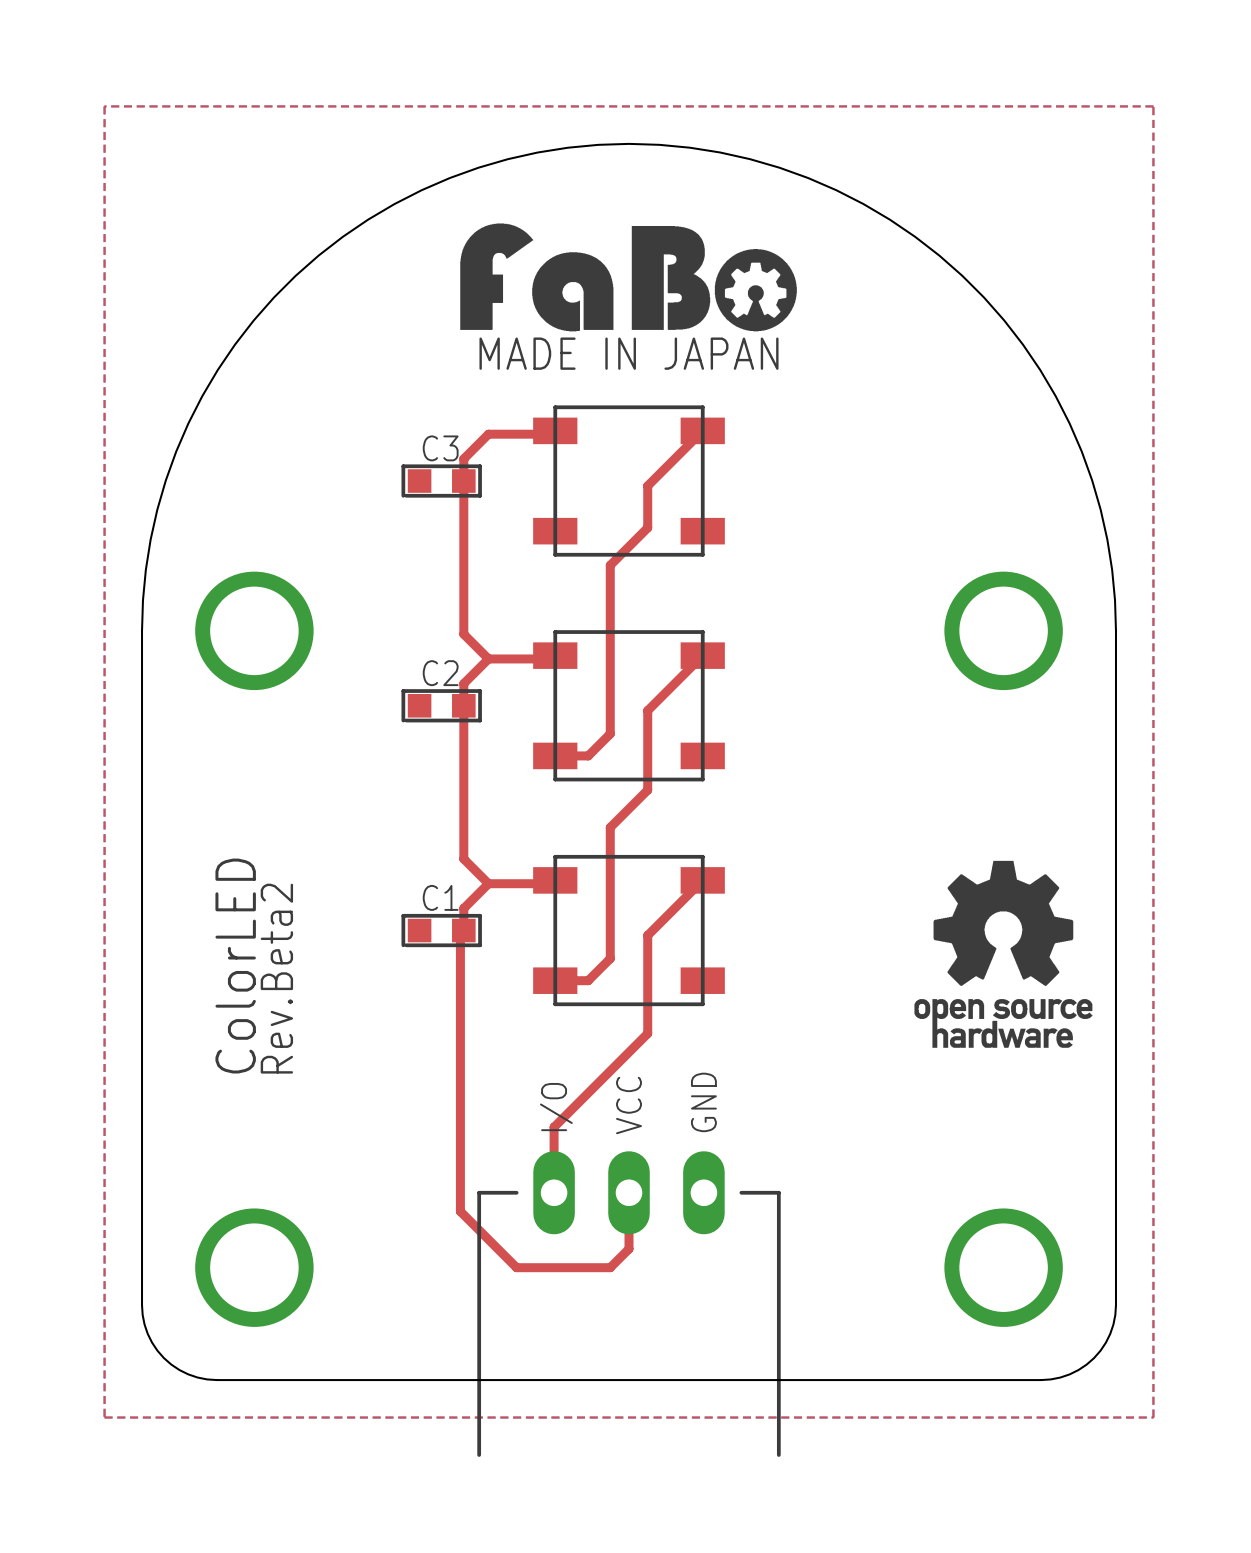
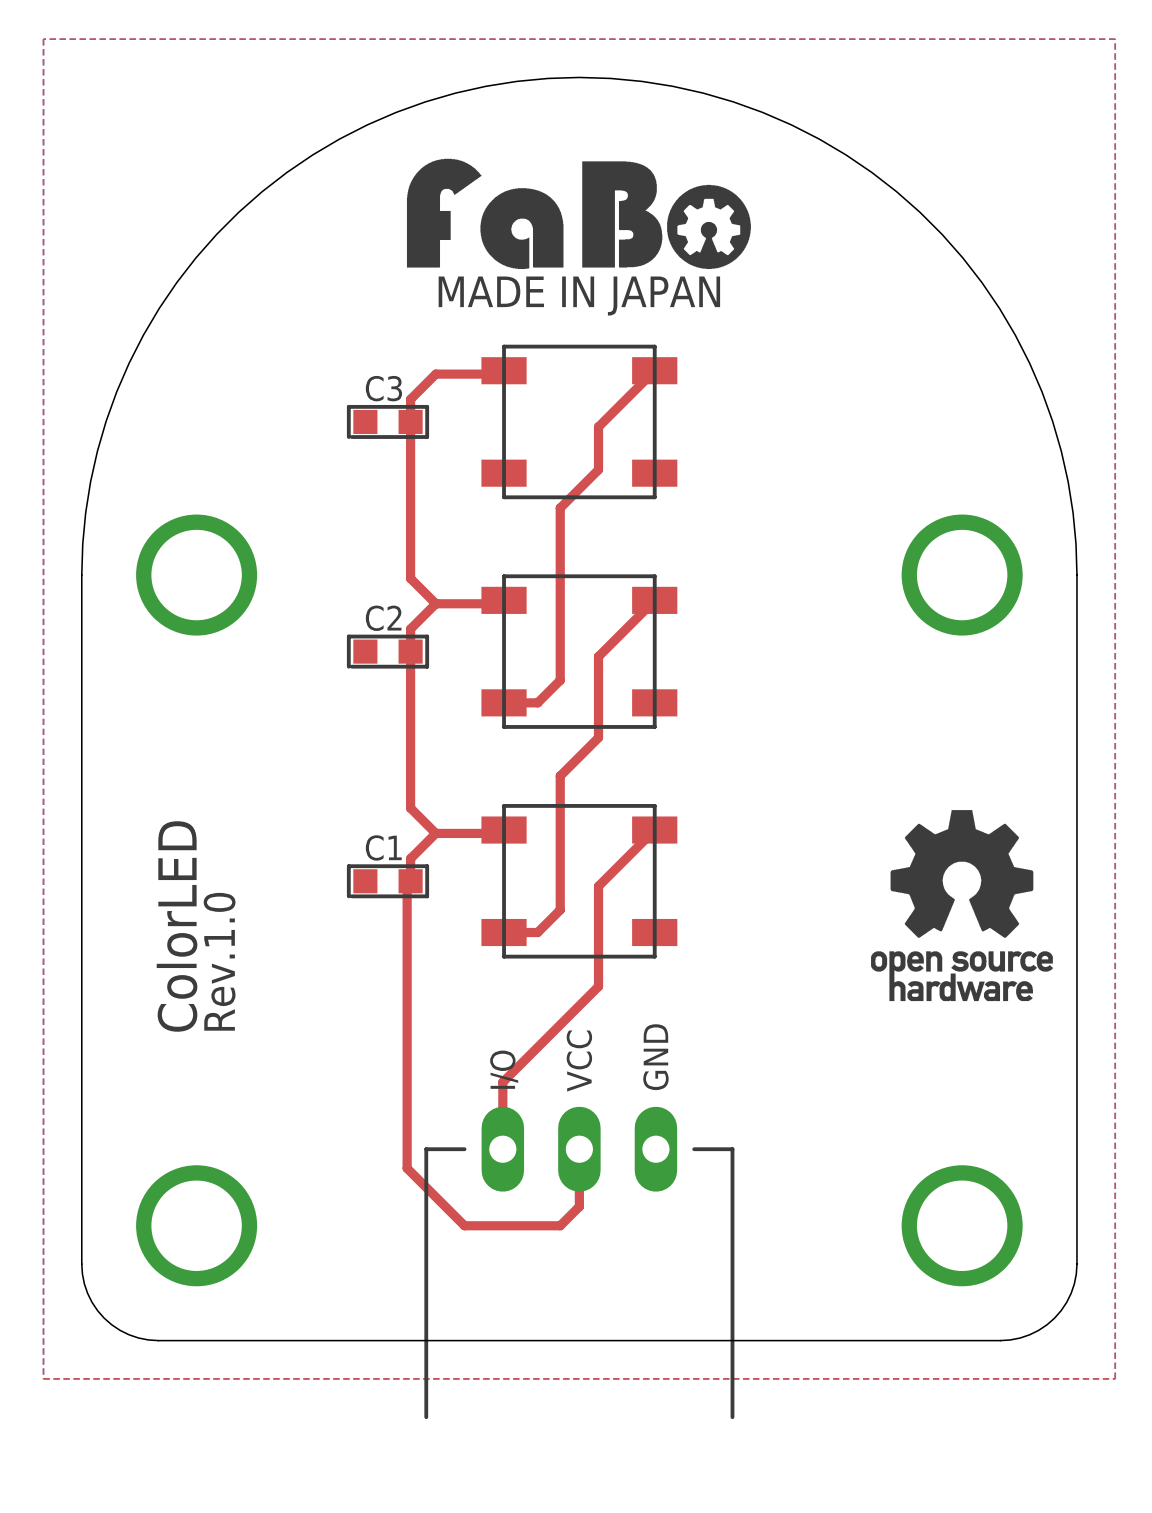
text: Rev.Beta2 (276, 978) -> Rev.1.0 (219, 961)

